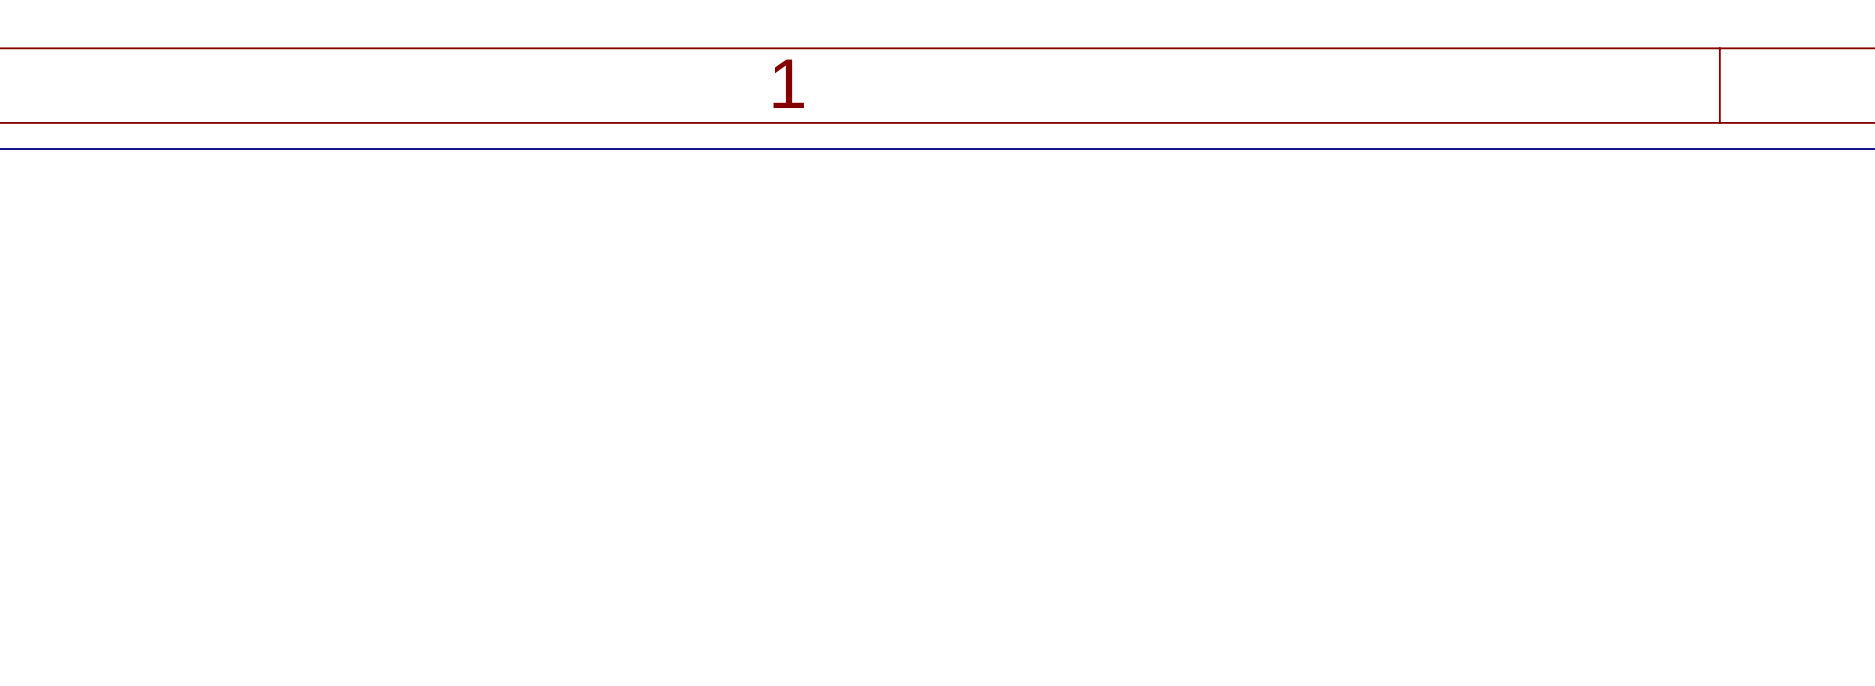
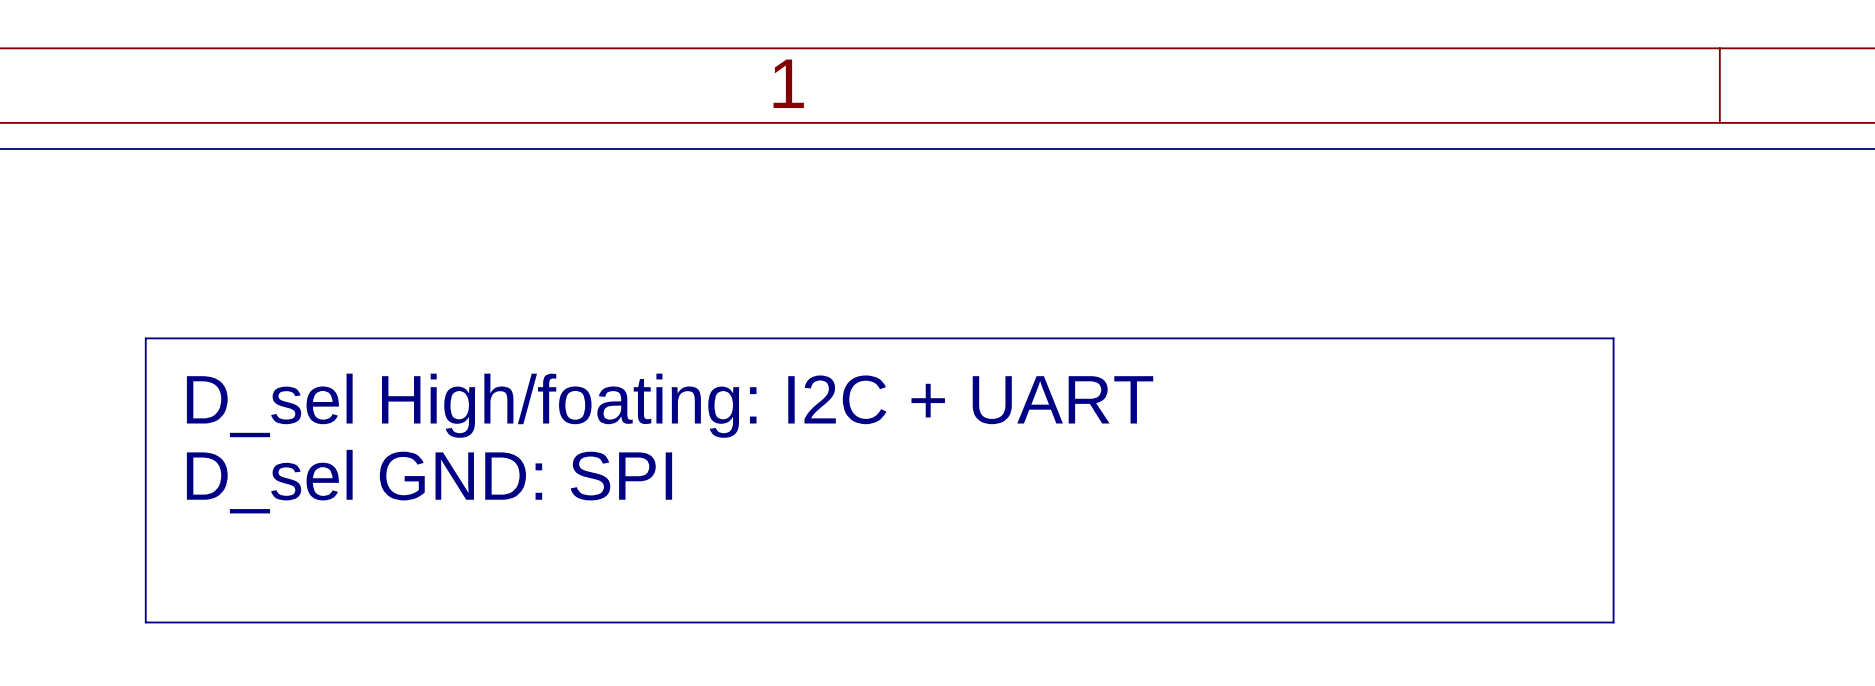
line: none -> (145, 338) (1613, 338) (1613, 622) (145, 622) (145, 338)
text: none -> D_sel High/foating: I2C + UART (670, 405)
text: none -> D_sel GND: SPI (429, 481)

